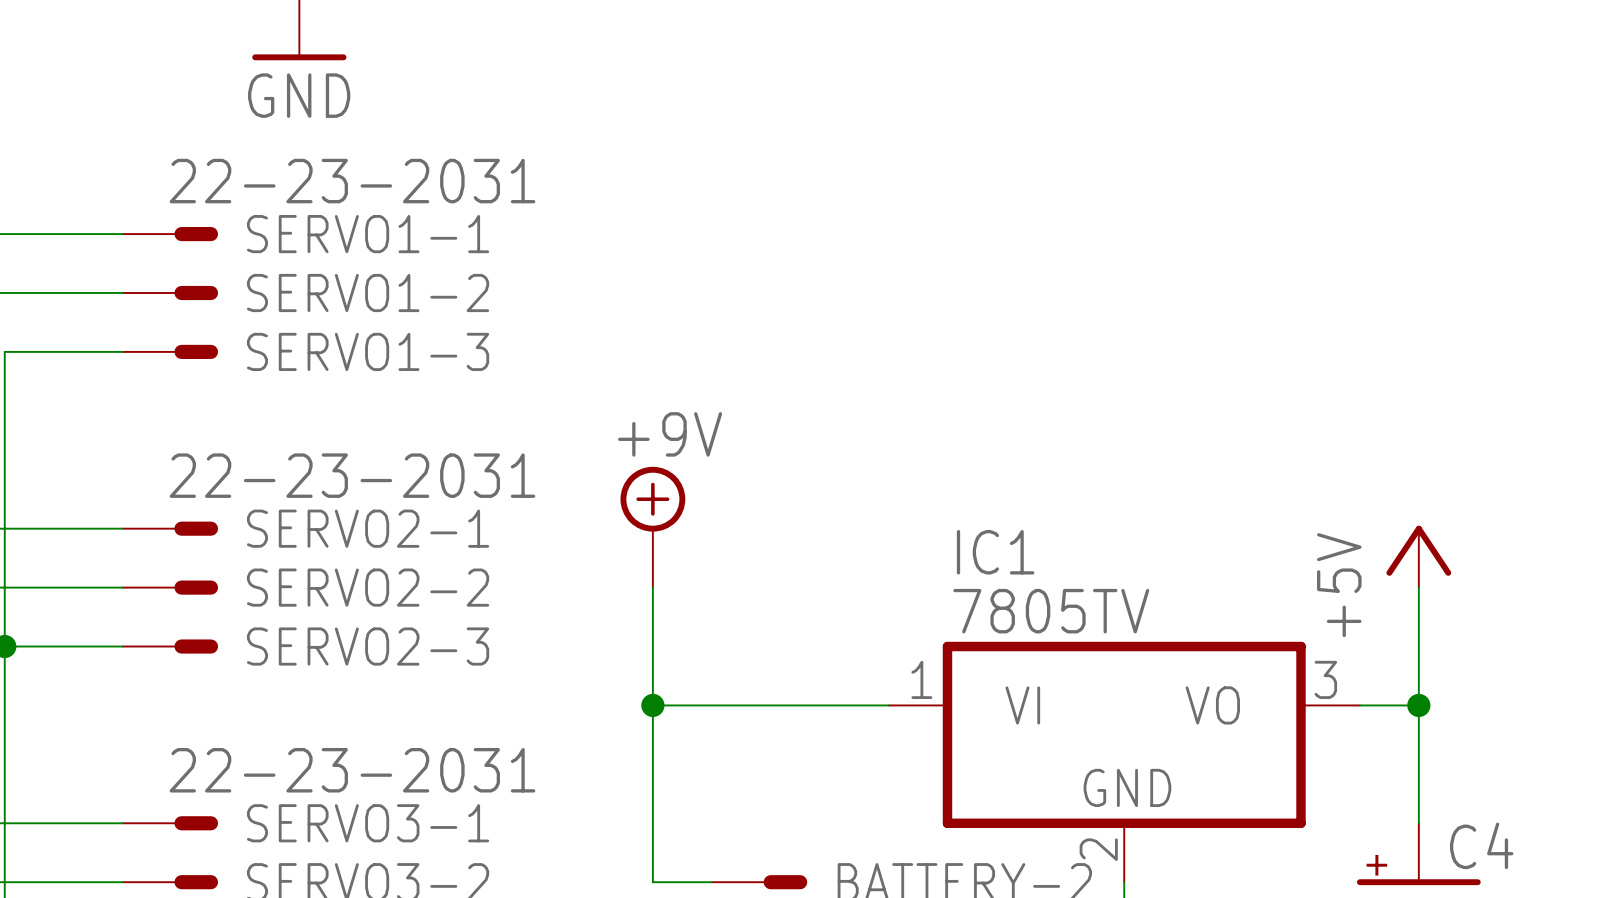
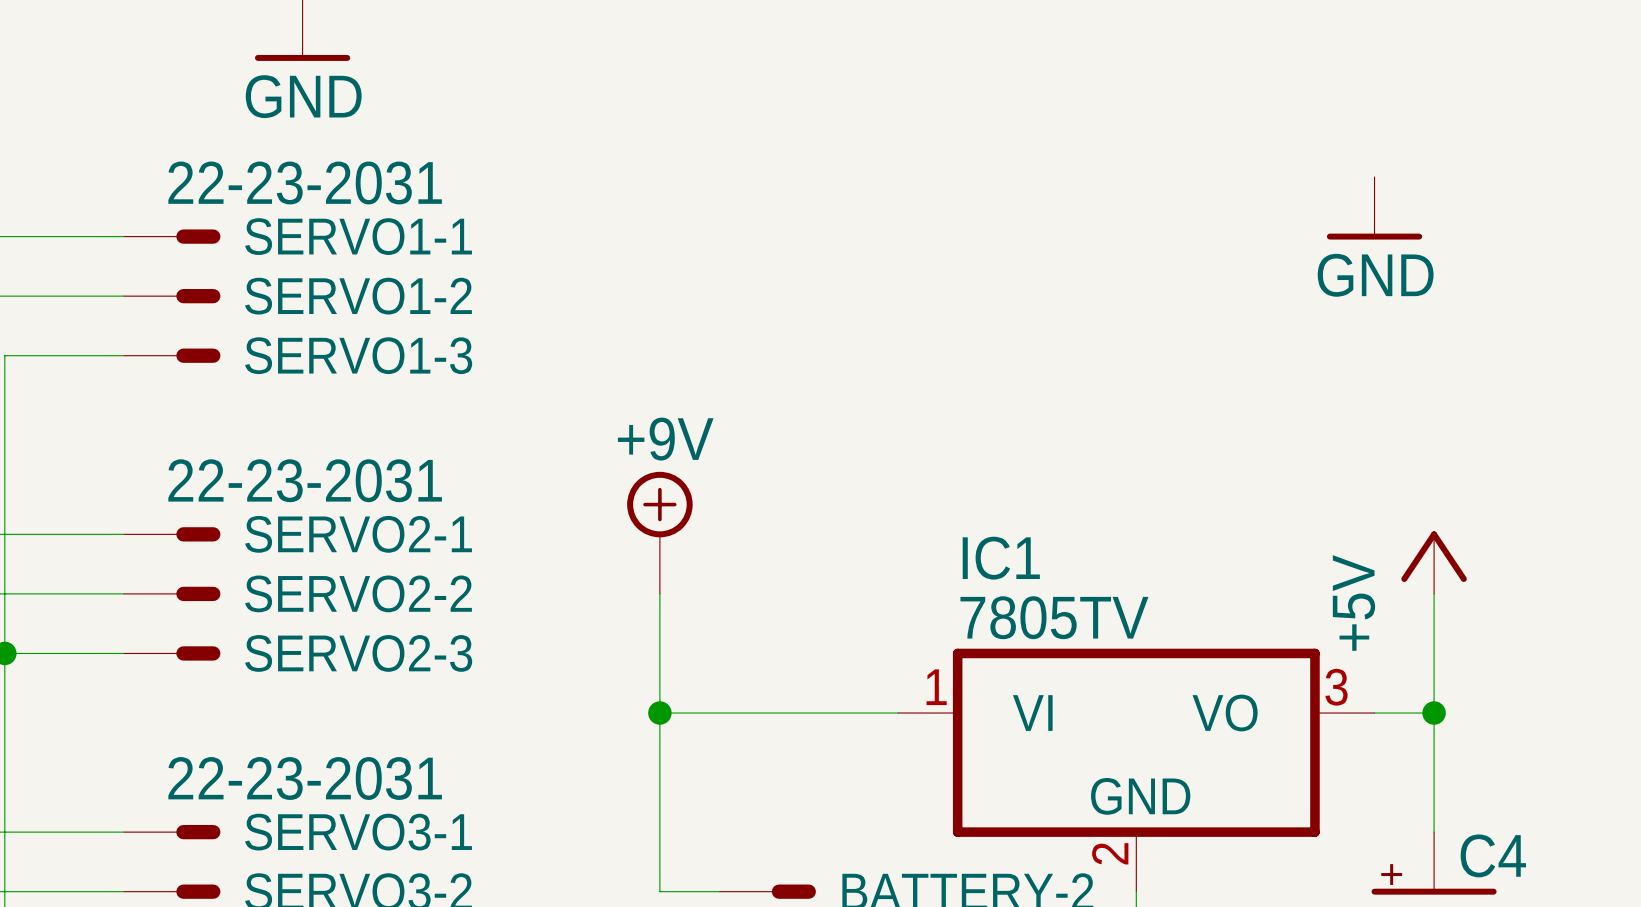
power symbol: none -> GND (1374, 208)

